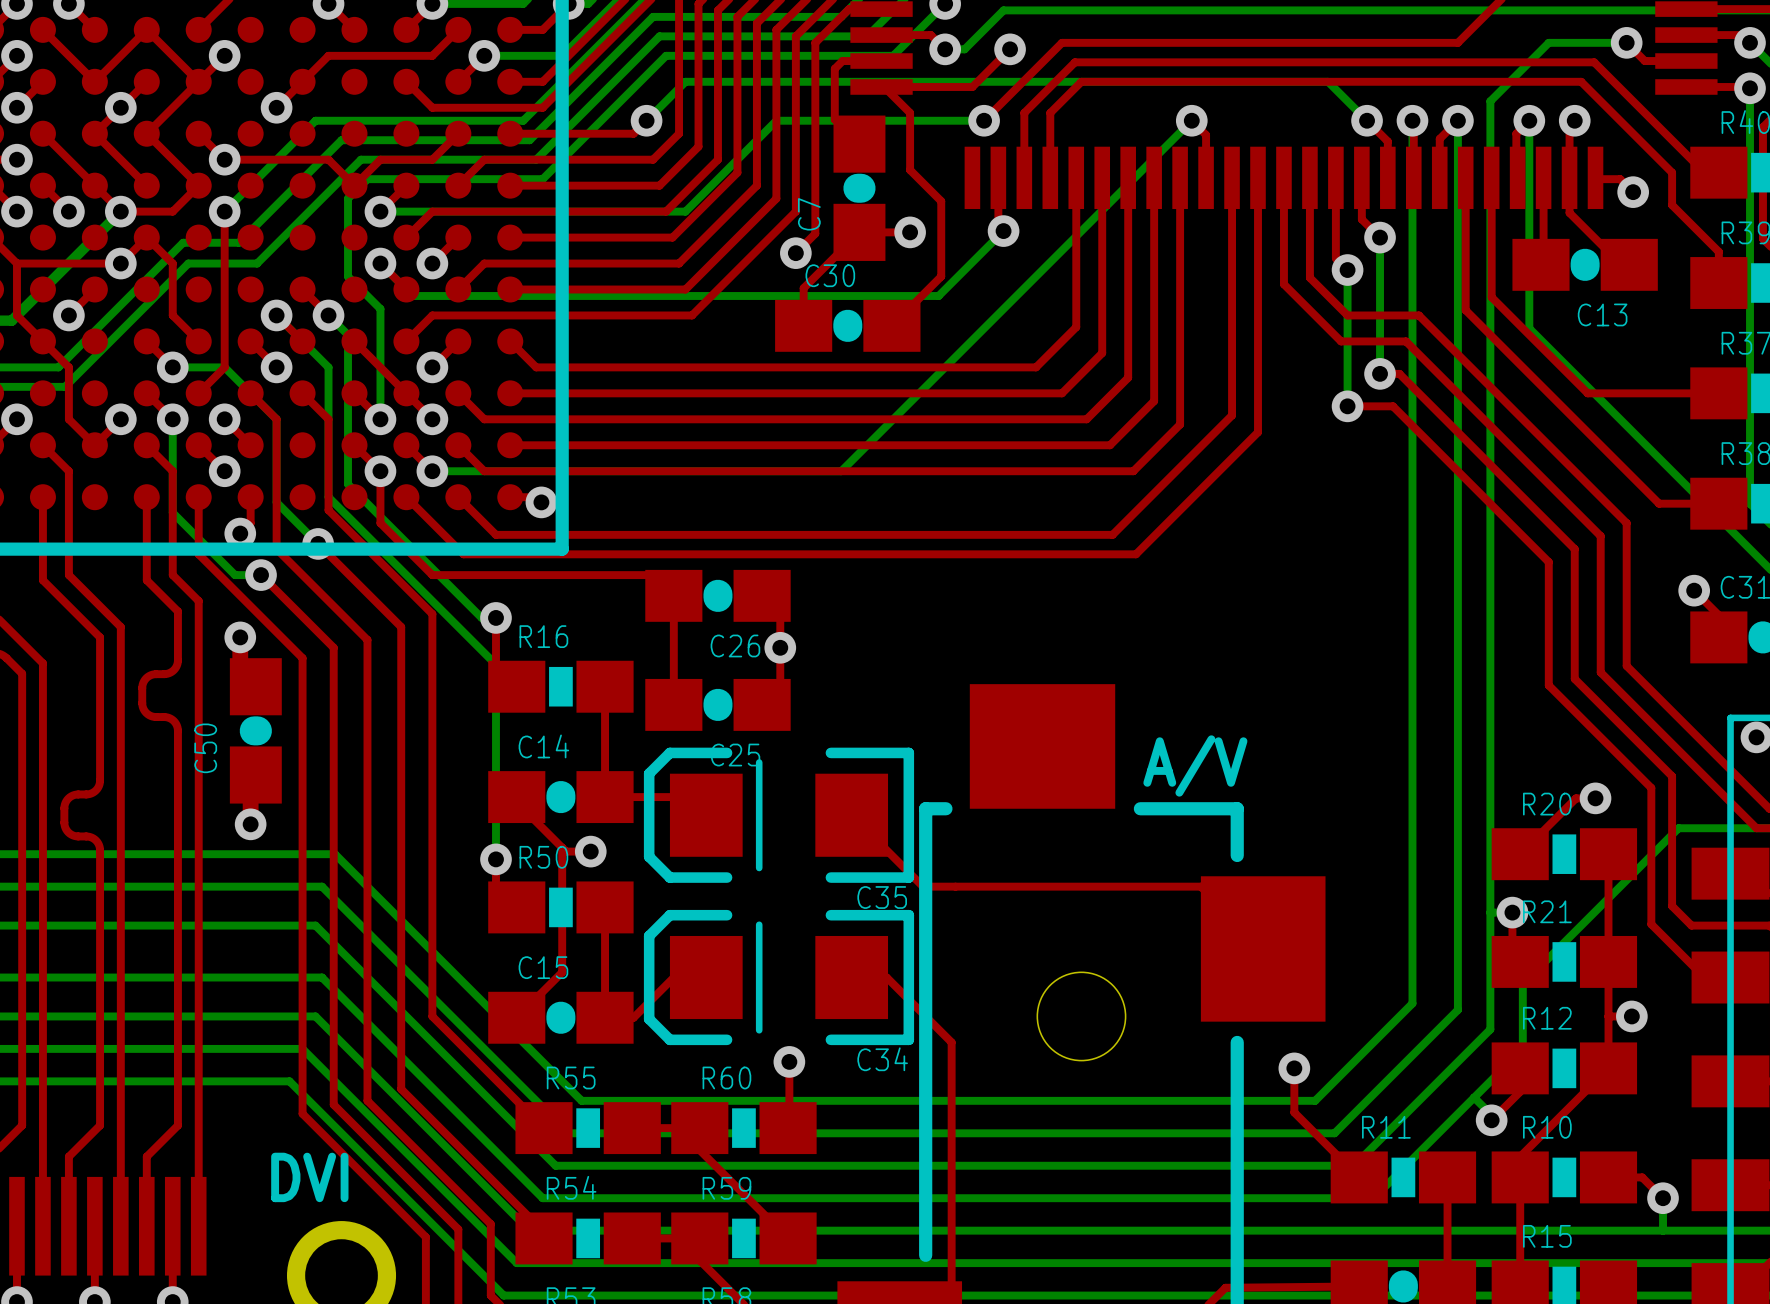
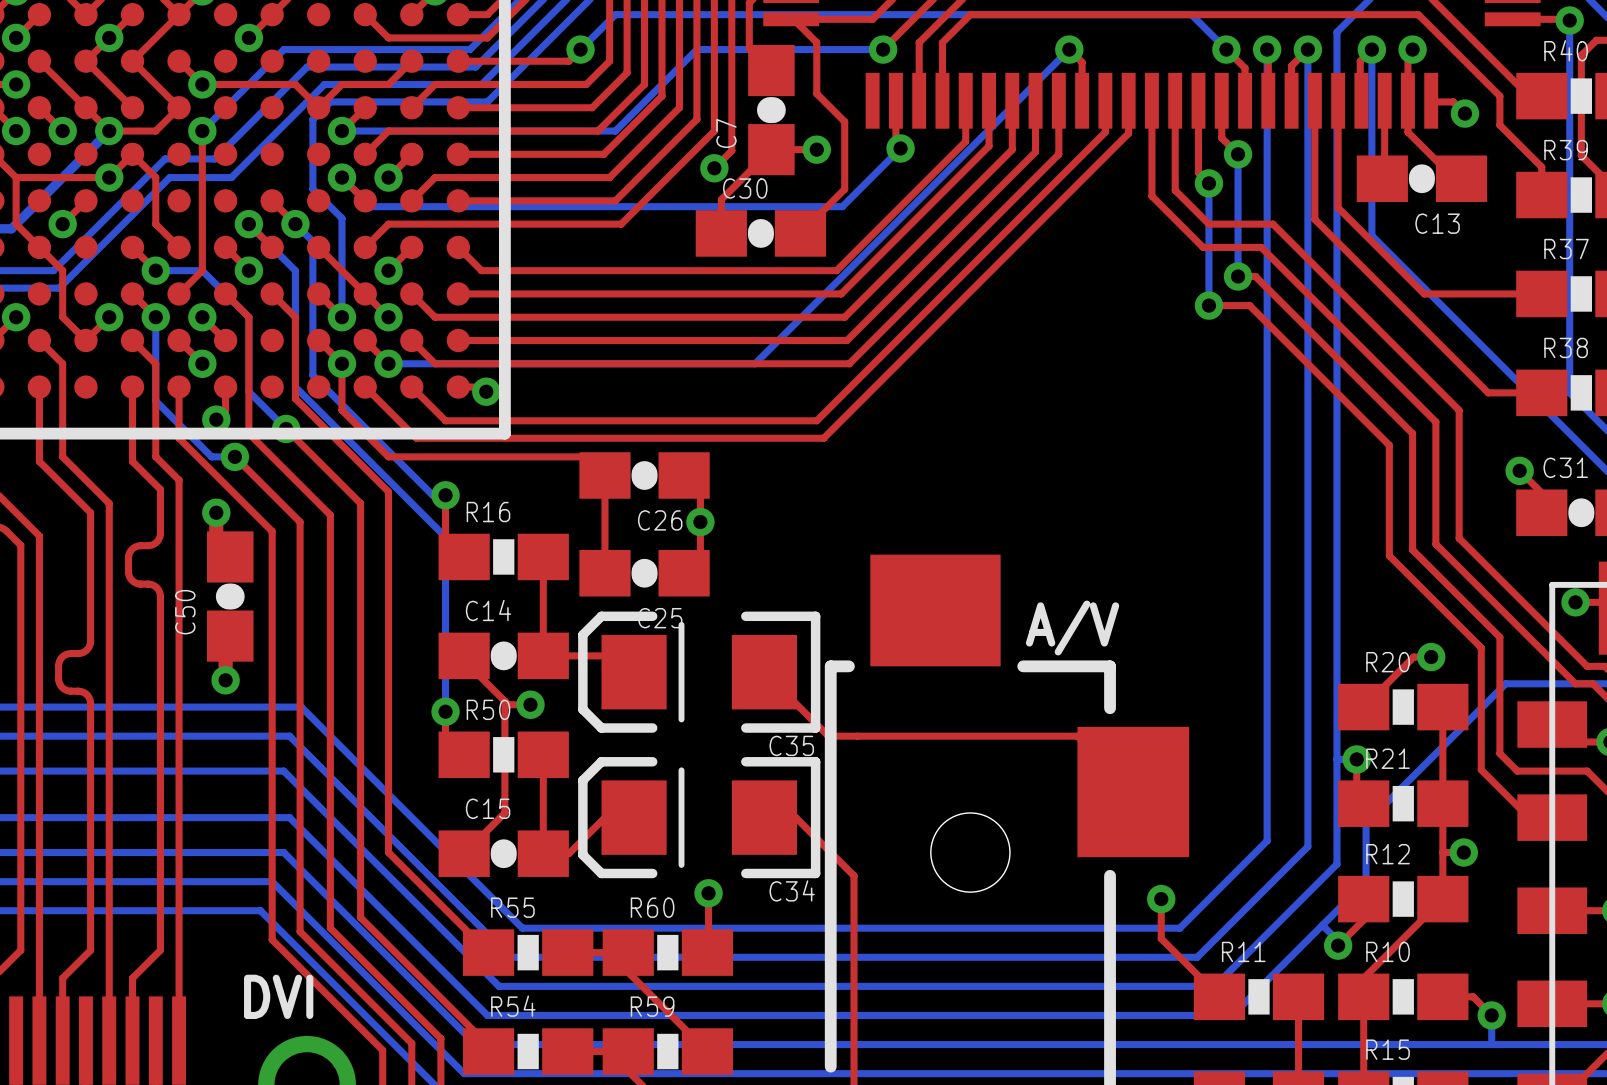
top track: (1232, 212) (1232, 415) (1112, 534) (910, 534) -> (1105, 132) (816, 420)
top track: (1258, 214) (1258, 432) (1135, 554) (917, 554) -> (1128, 133) (823, 438)
top track: (1076, 223) (1076, 327) (1036, 367) (932, 367) -> (965, 141) (836, 270)
top track: (1102, 228) (1102, 353) (1061, 393) (937, 393) -> (989, 146) (841, 293)
top track: (1128, 232) (1128, 377) (1086, 419) (941, 419) -> (1012, 149) (844, 317)
top track: (1154, 234) (1154, 401) (1110, 445) (943, 445) -> (1035, 151) (847, 340)
top track: (1180, 237) (1180, 424) (1133, 471) (946, 471) -> (1058, 154) (849, 363)

